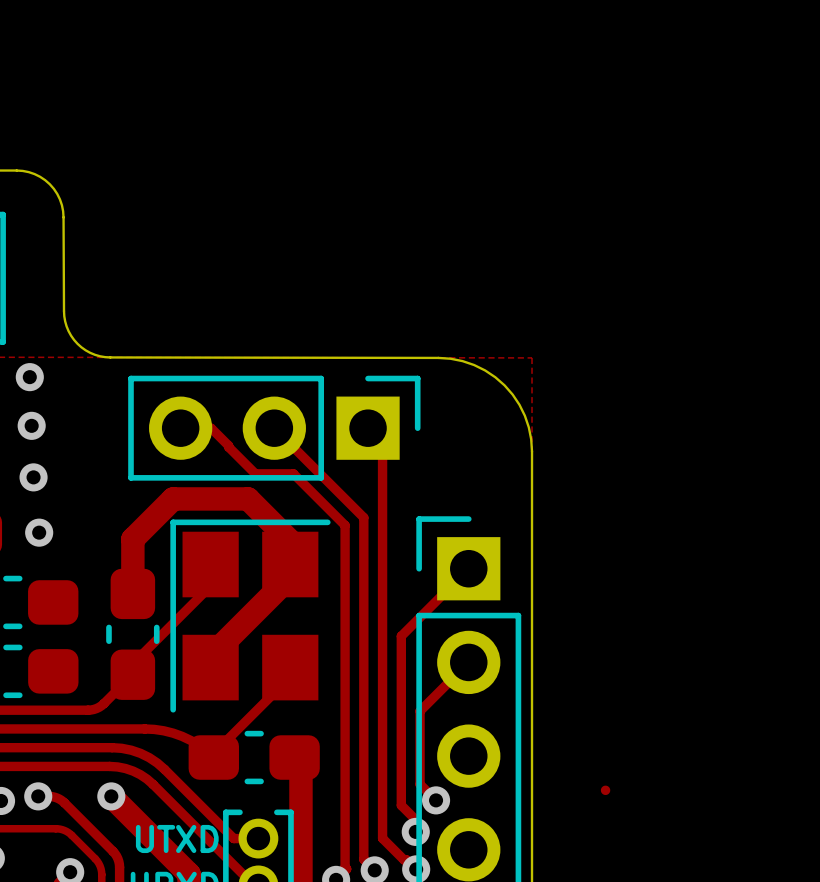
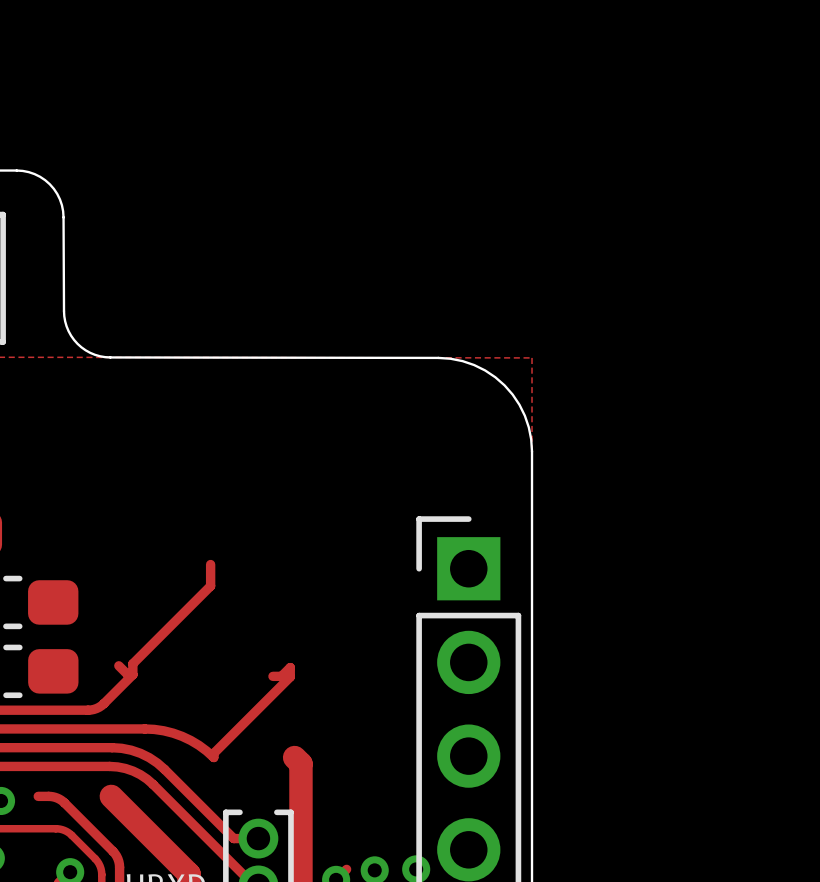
via: (29, 377) -> none
via: (31, 425) -> none
track: (180, 428) (211, 428) (255, 473) (293, 473) (345, 525) (345, 867) (346, 868) -> none
track: (274, 428) (363, 517) (363, 859) (374, 870) -> none
part: (274, 428) -> none
track: (368, 442) (368, 428) (382, 442) (382, 838) (416, 869) -> none
via: (33, 477) -> none
via: (39, 532) -> none
track: (468, 568) (401, 636) (401, 805) (415, 819) (415, 831) -> none
track: (290, 583) (290, 541) (248, 498) (173, 498) (132, 539) (132, 593) -> none
track: (290, 583) (281, 583) (210, 654) (210, 679) -> none
part: (250, 616) -> none
part: (132, 634) -> none
track: (468, 662) (420, 711) (420, 784) (436, 800) -> none
part: (254, 757) -> none
drawing: [600, 785, 611, 796] -> none
via: (38, 796) -> none
via: (111, 796) -> none
via: (436, 800) -> none
via: (415, 831) -> none
text: UTXD (177, 838) -> none

